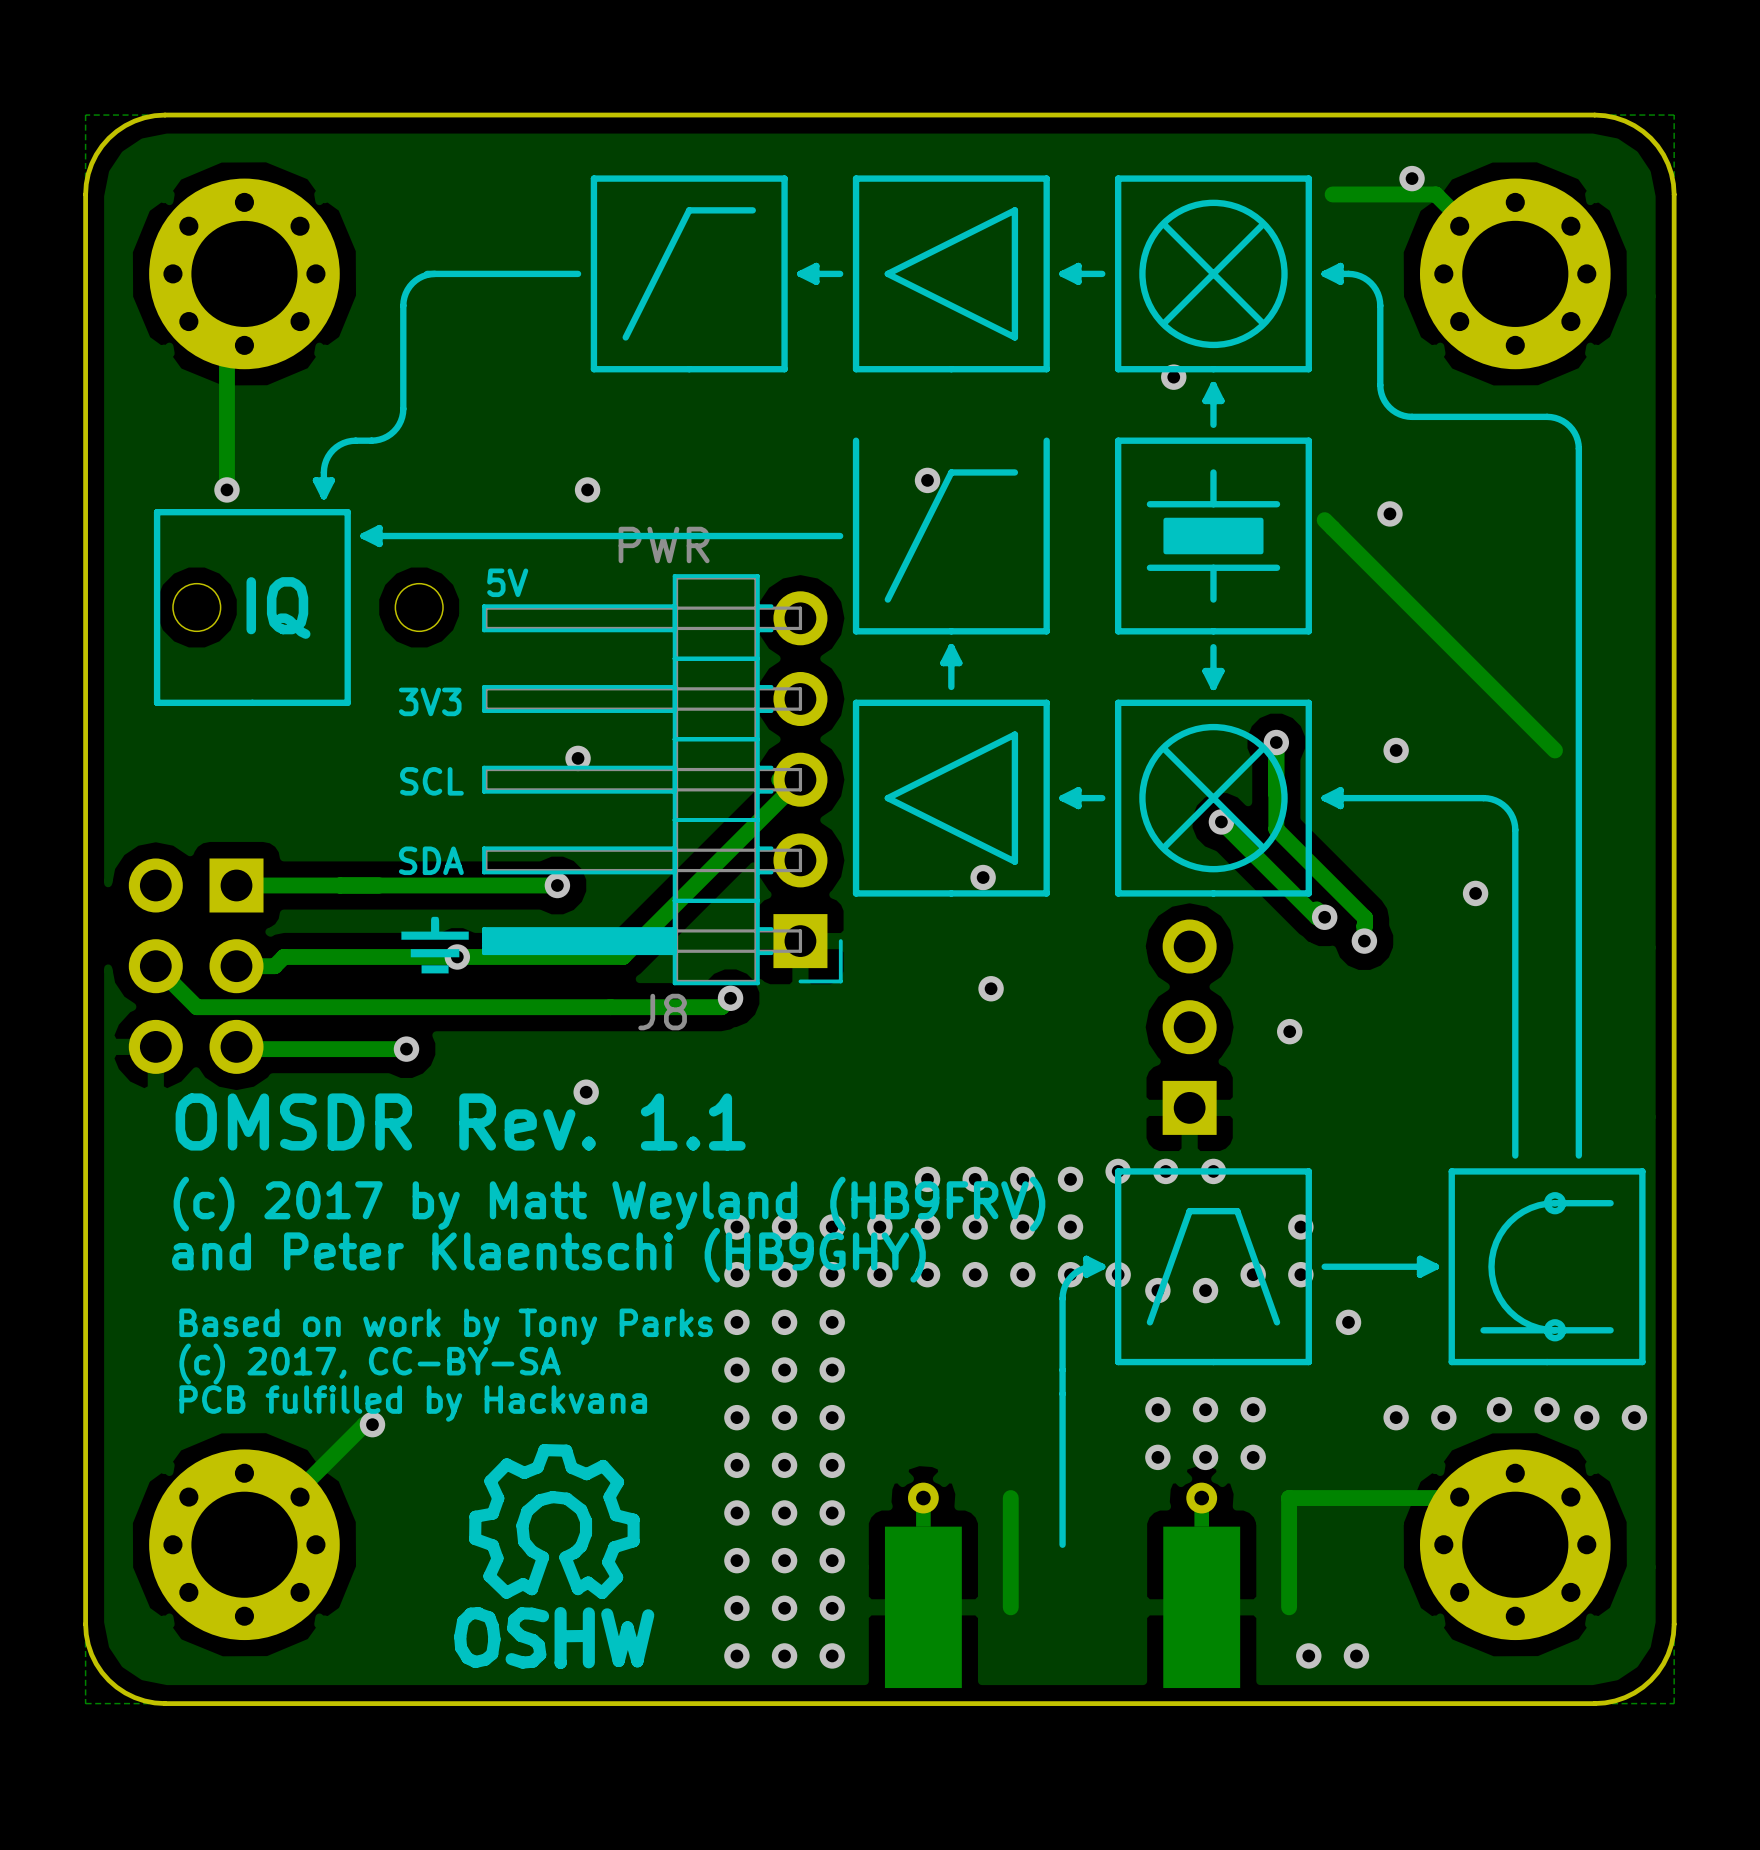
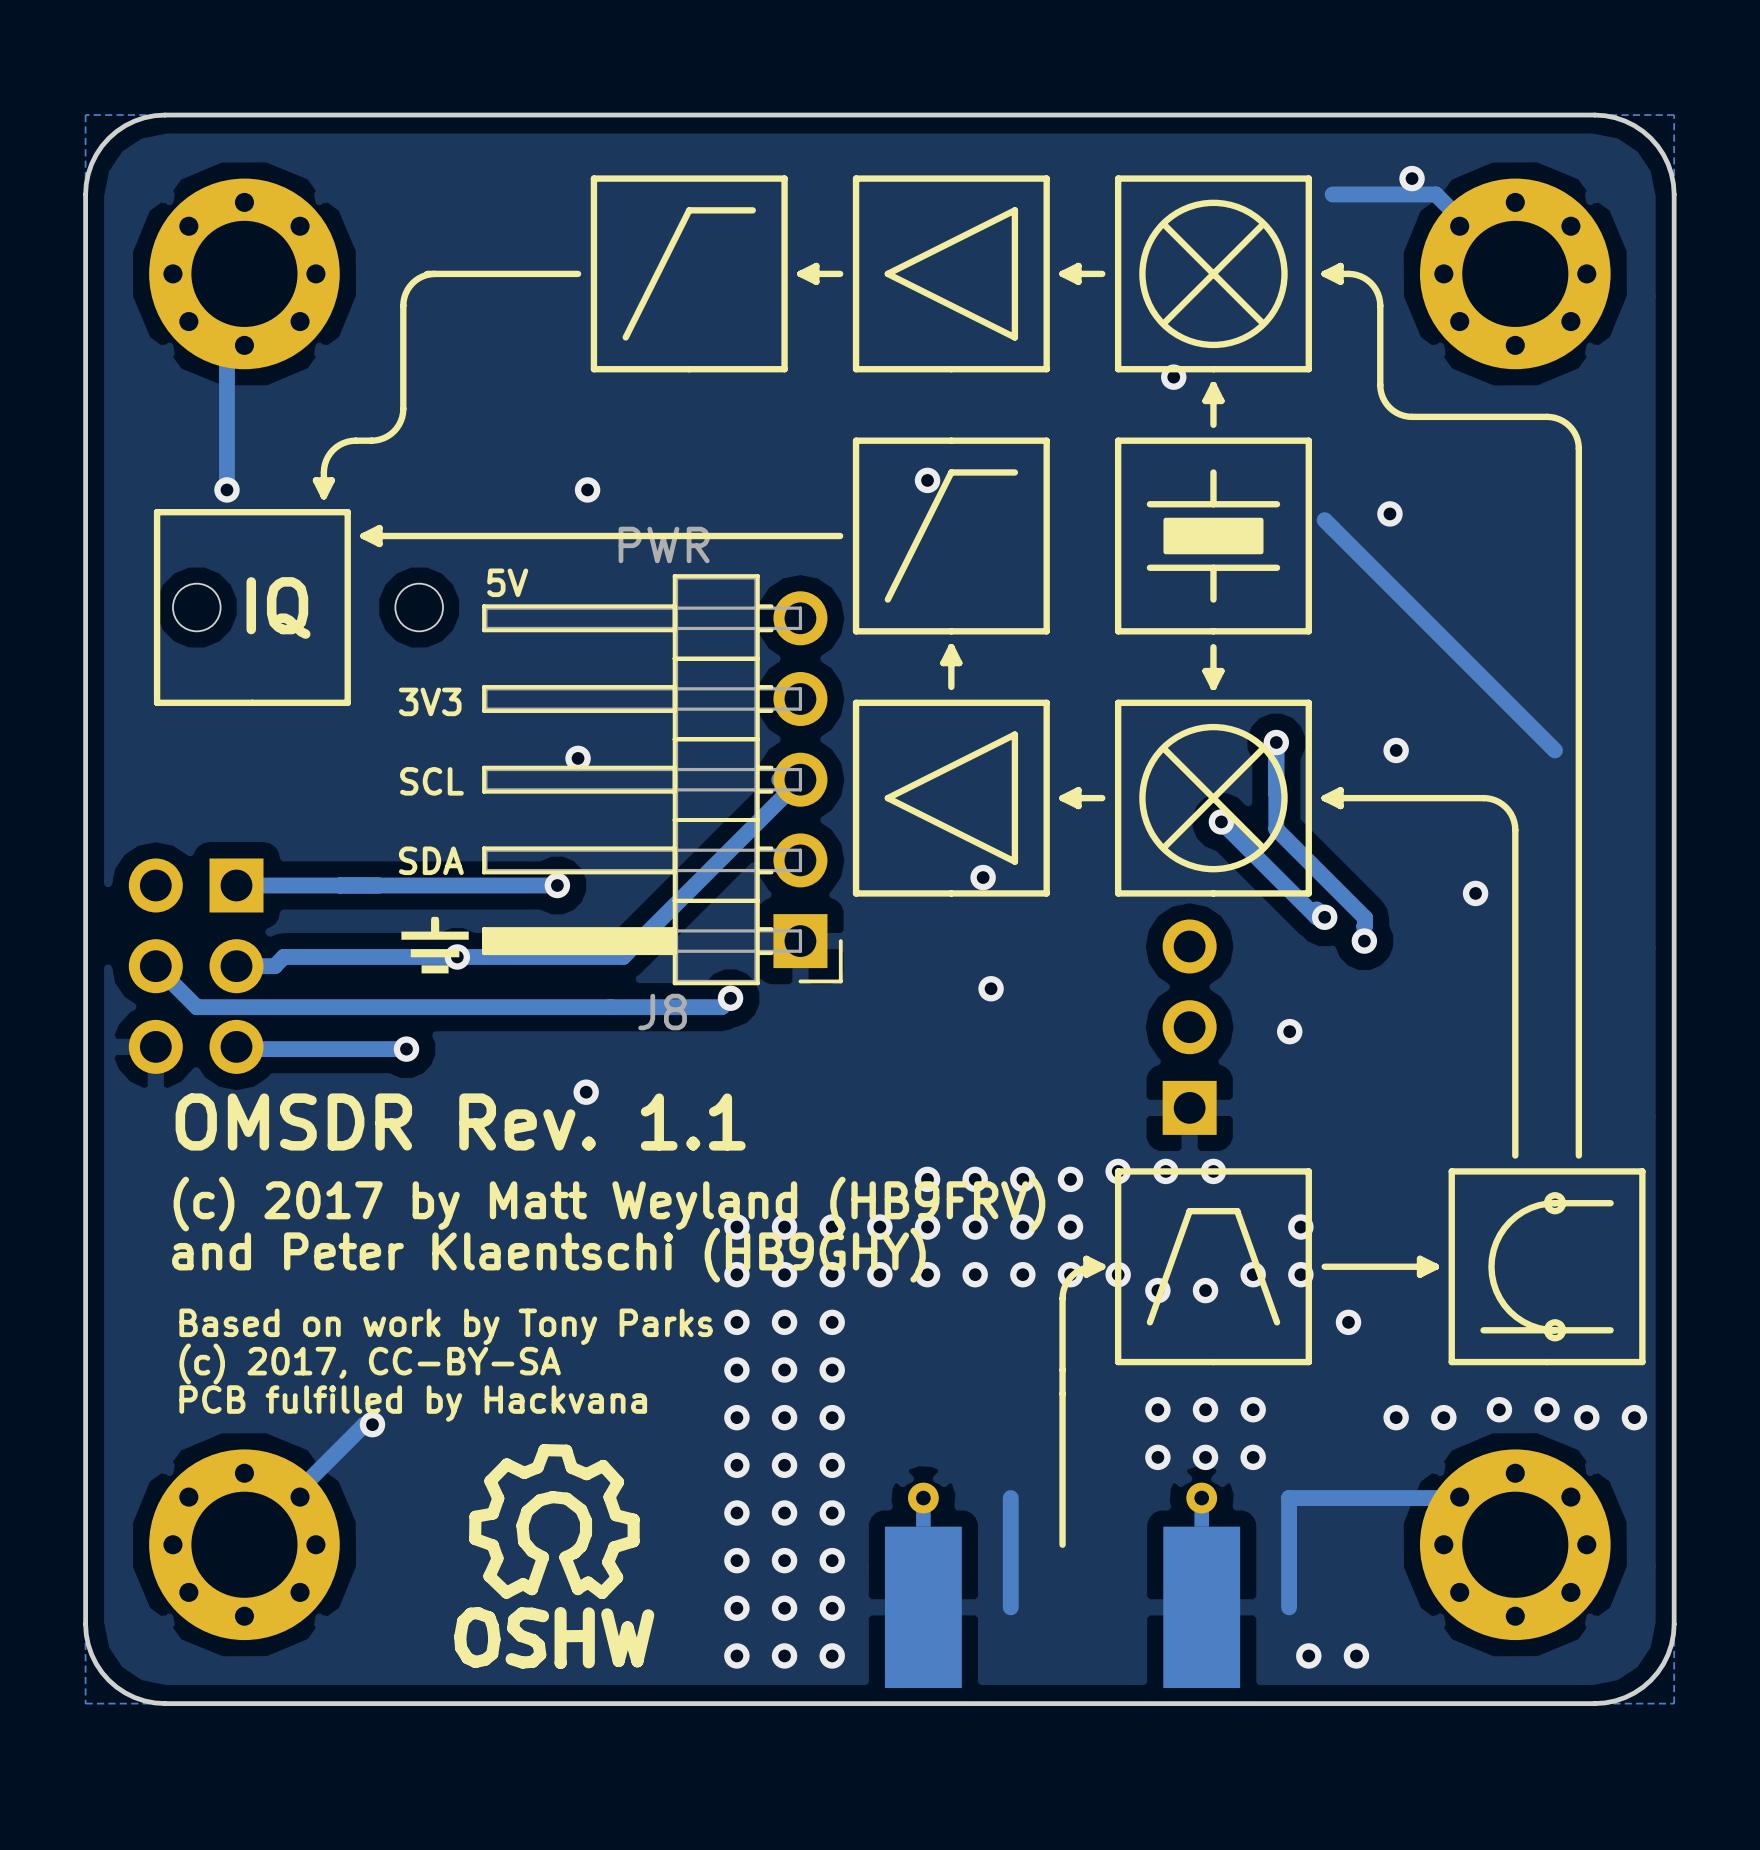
line: none -> (1046, 440) (856, 440)

